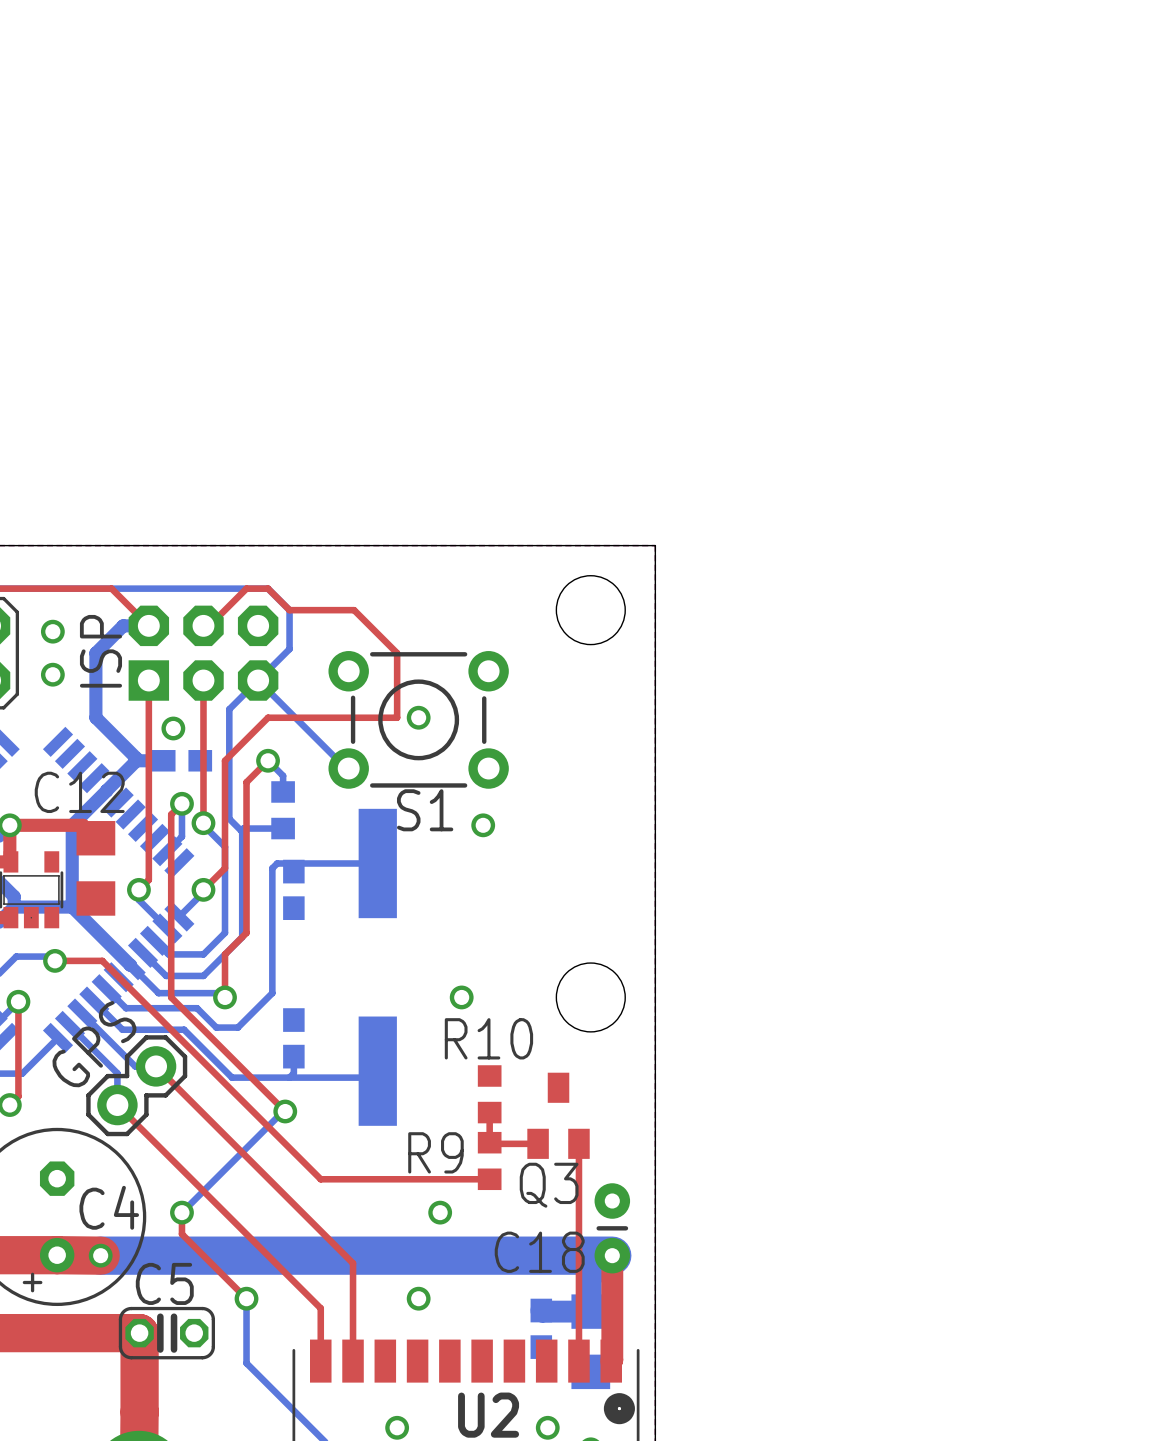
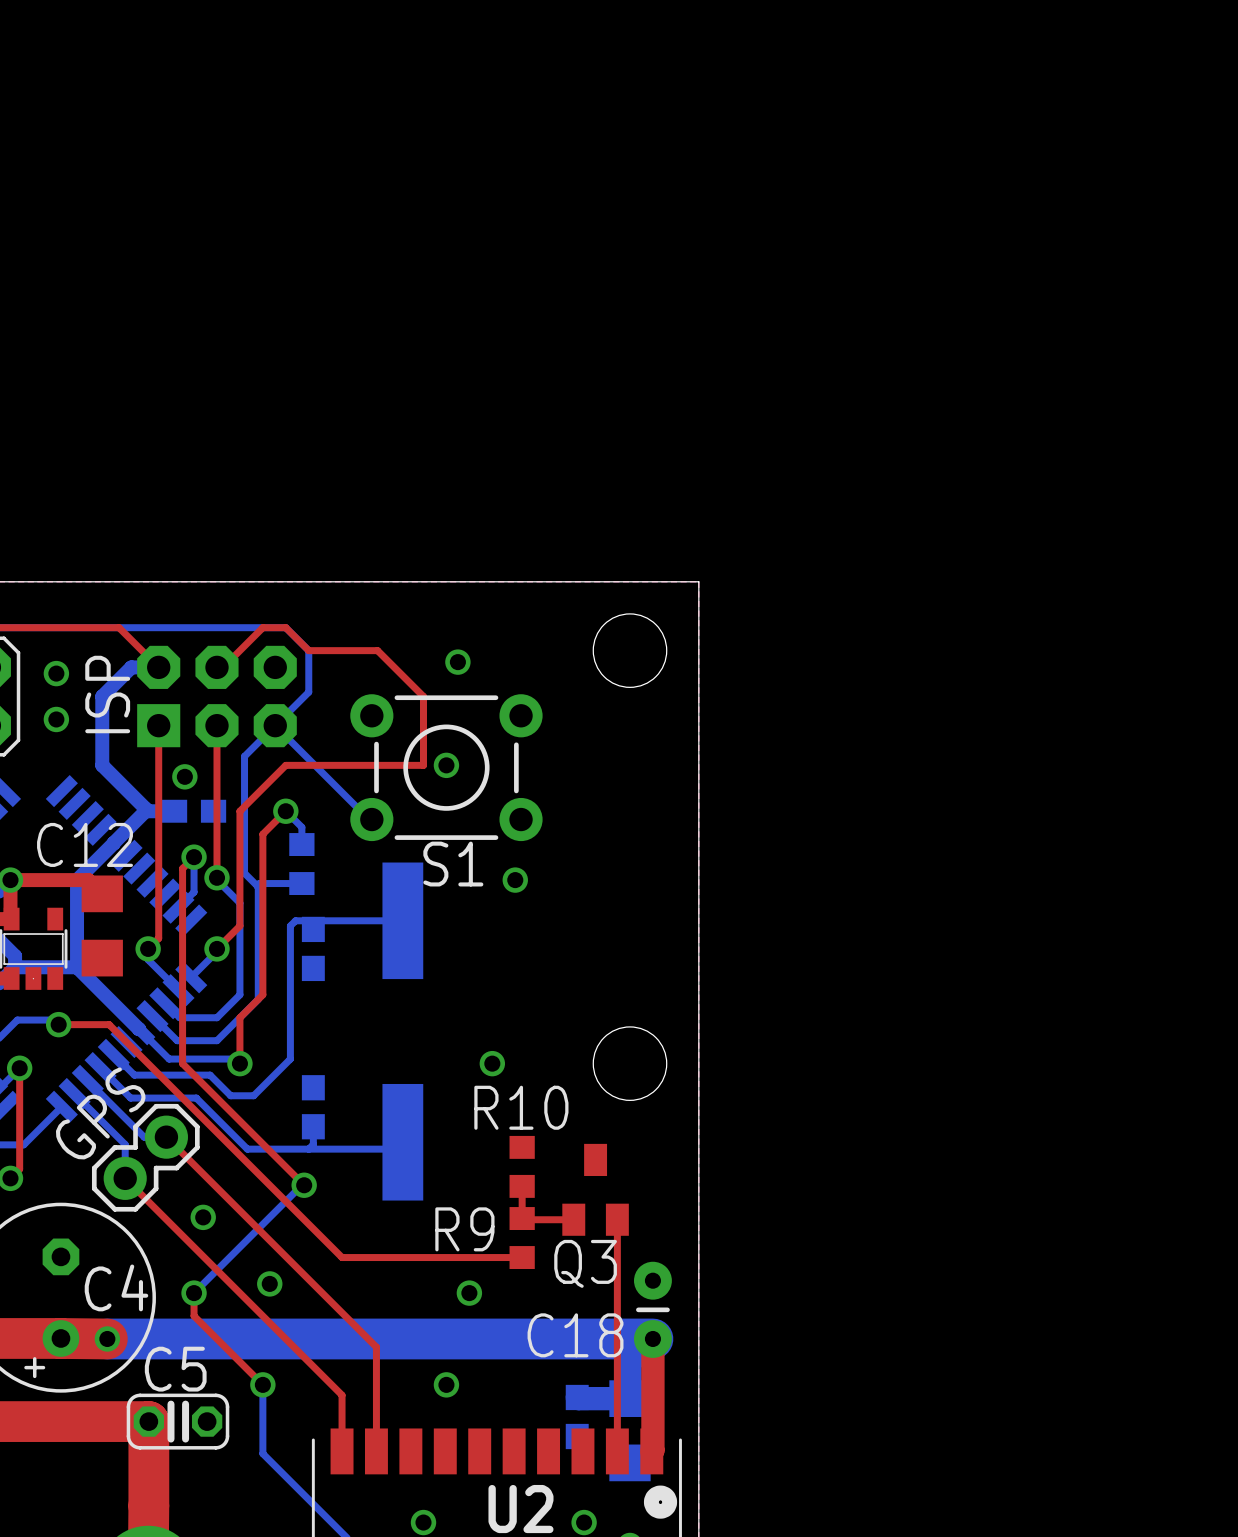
via: none -> (457, 662)
via: none -> (203, 1217)
via: none -> (269, 1283)

